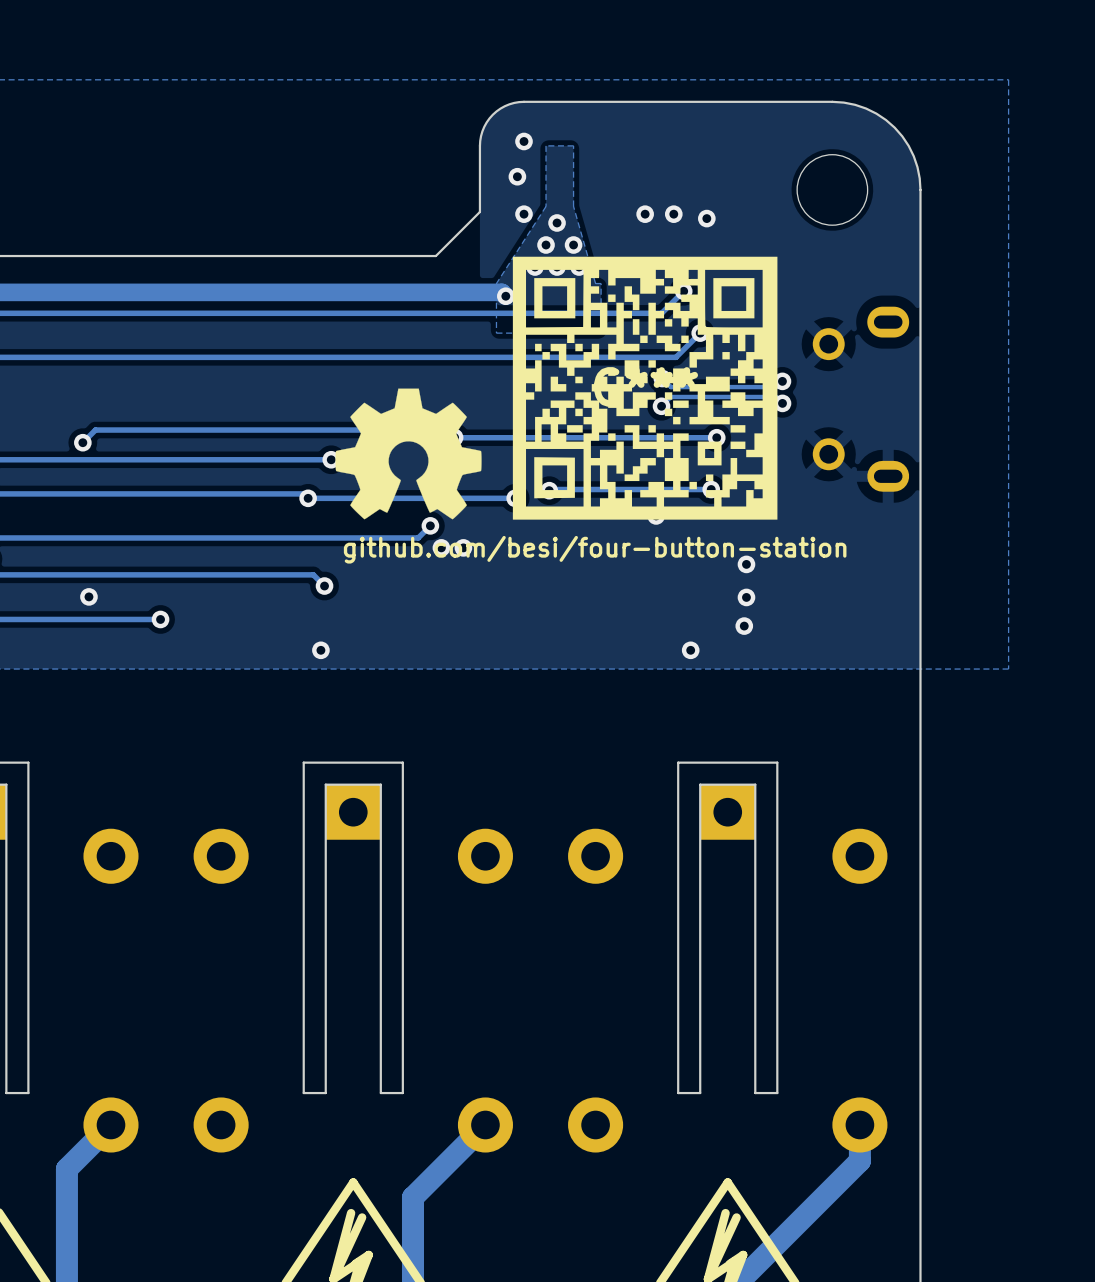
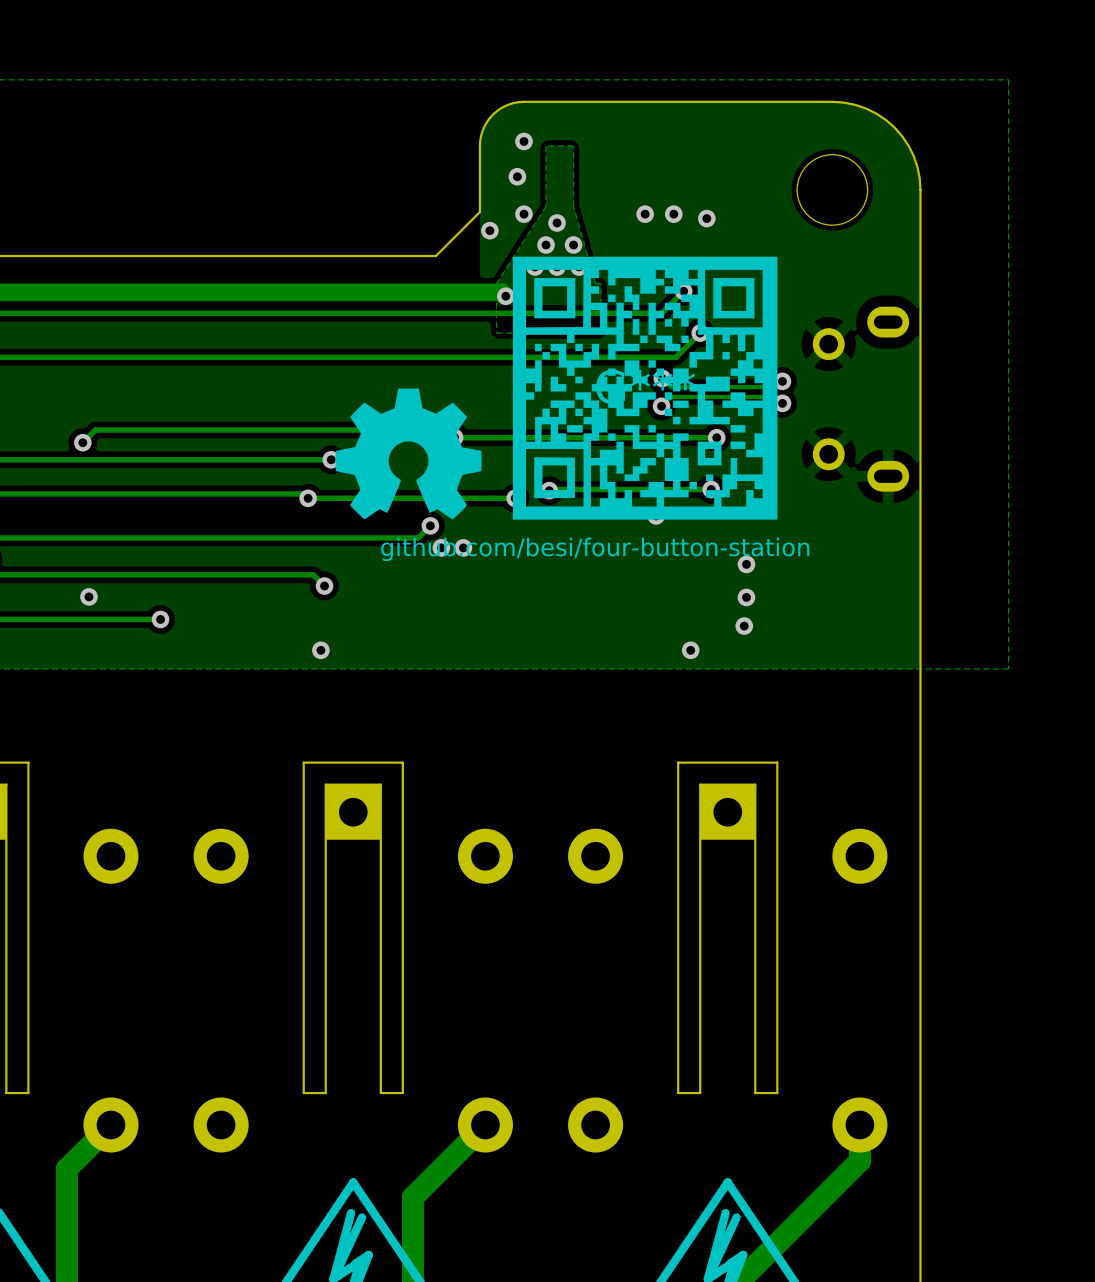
via: none -> (489, 230)

